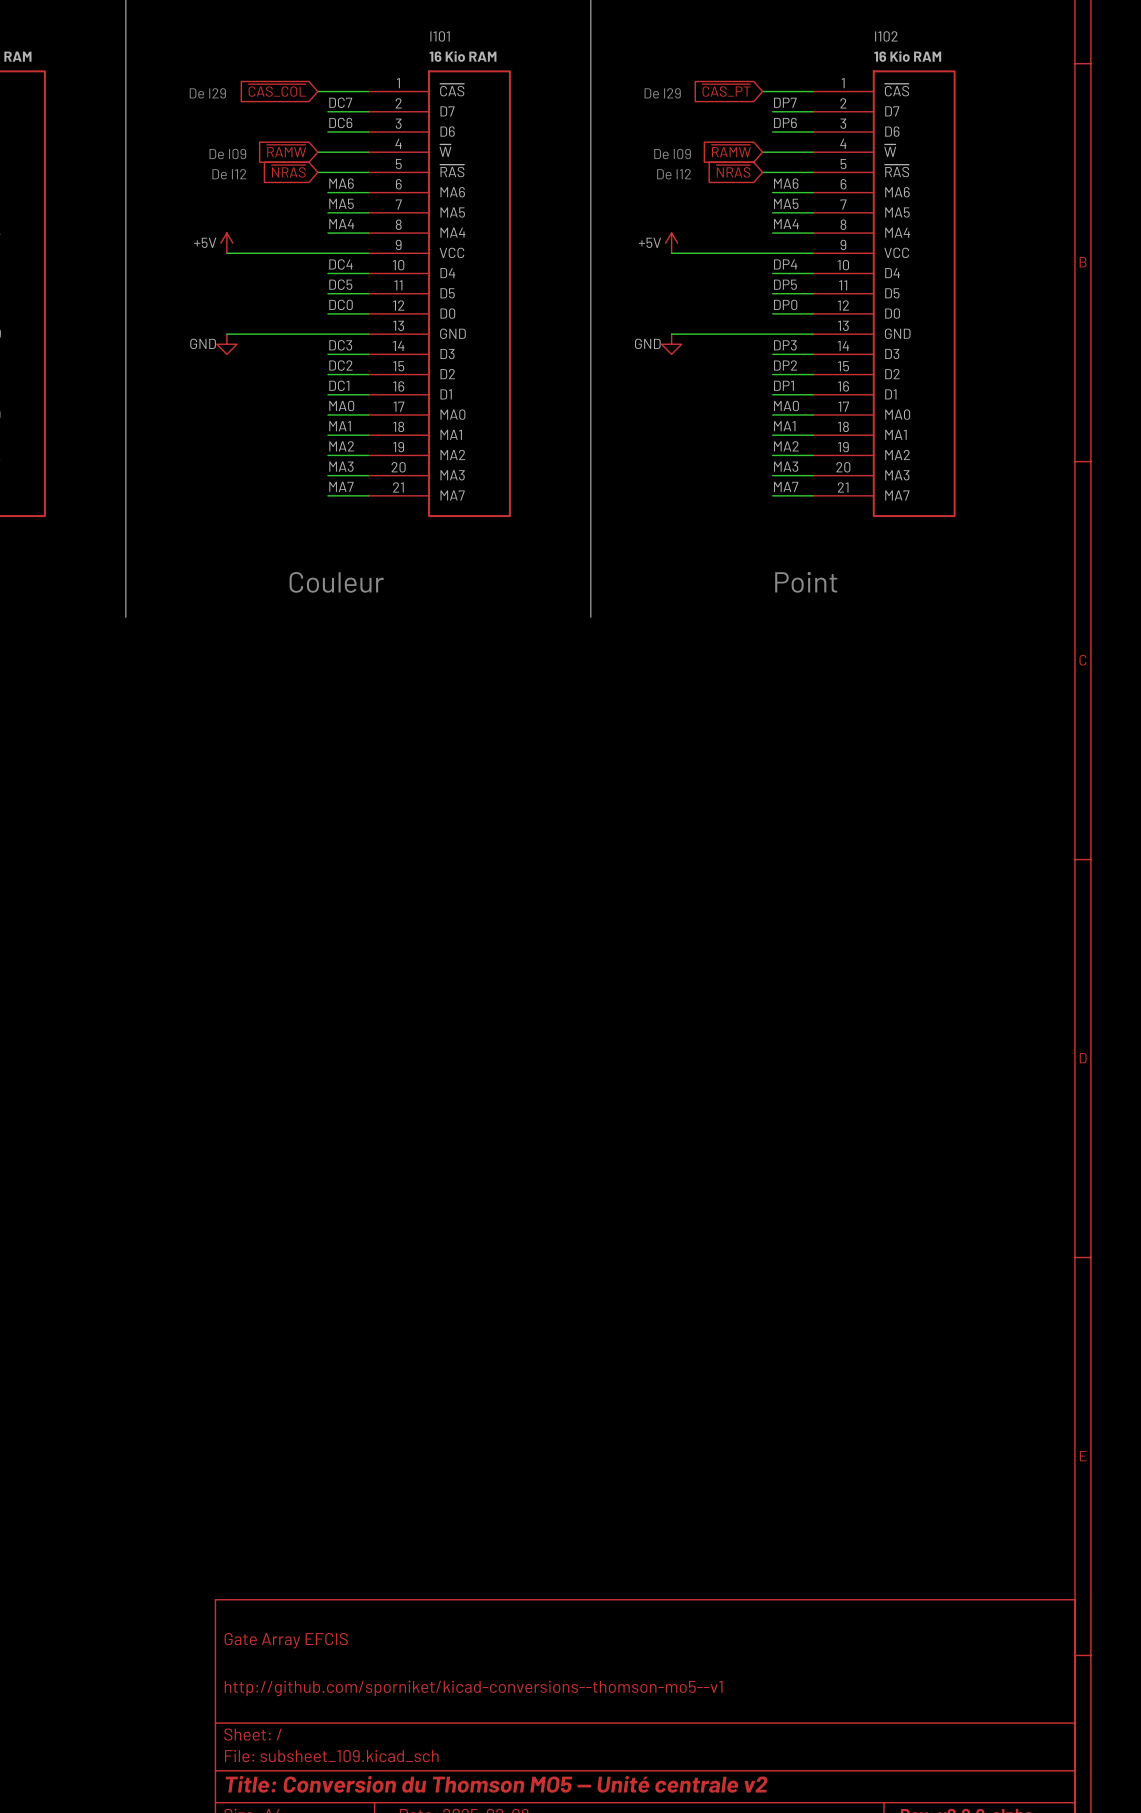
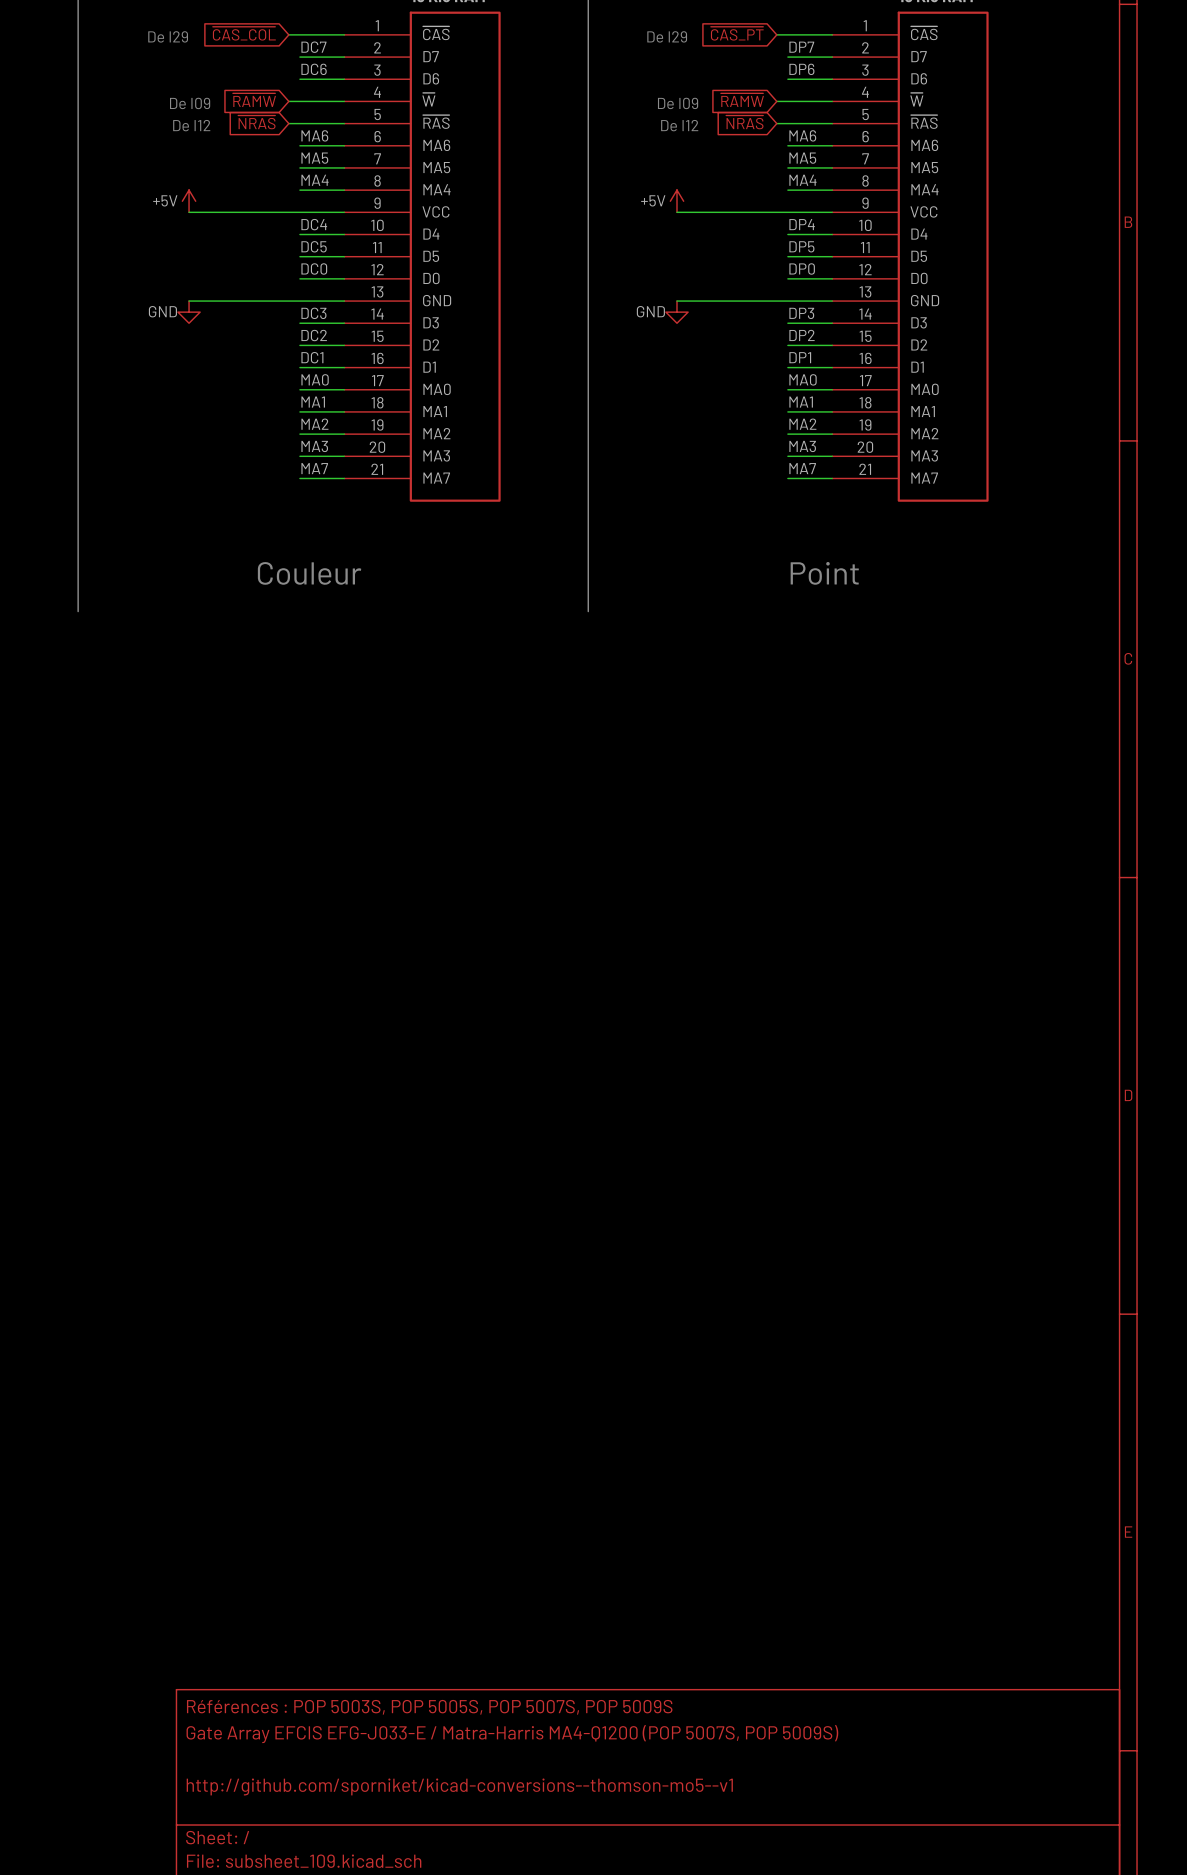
title block: none -> Références : POP 5003S, POP 5005S, POP 5007S, POP 5009S (429, 1707)
title block: Gate Array EFCIS (286, 1640) -> Gate Array EFCIS EFG-J033-E / Matra-Harris MA4-Q1200 (POP 5007S, POP 5009S) (512, 1734)

